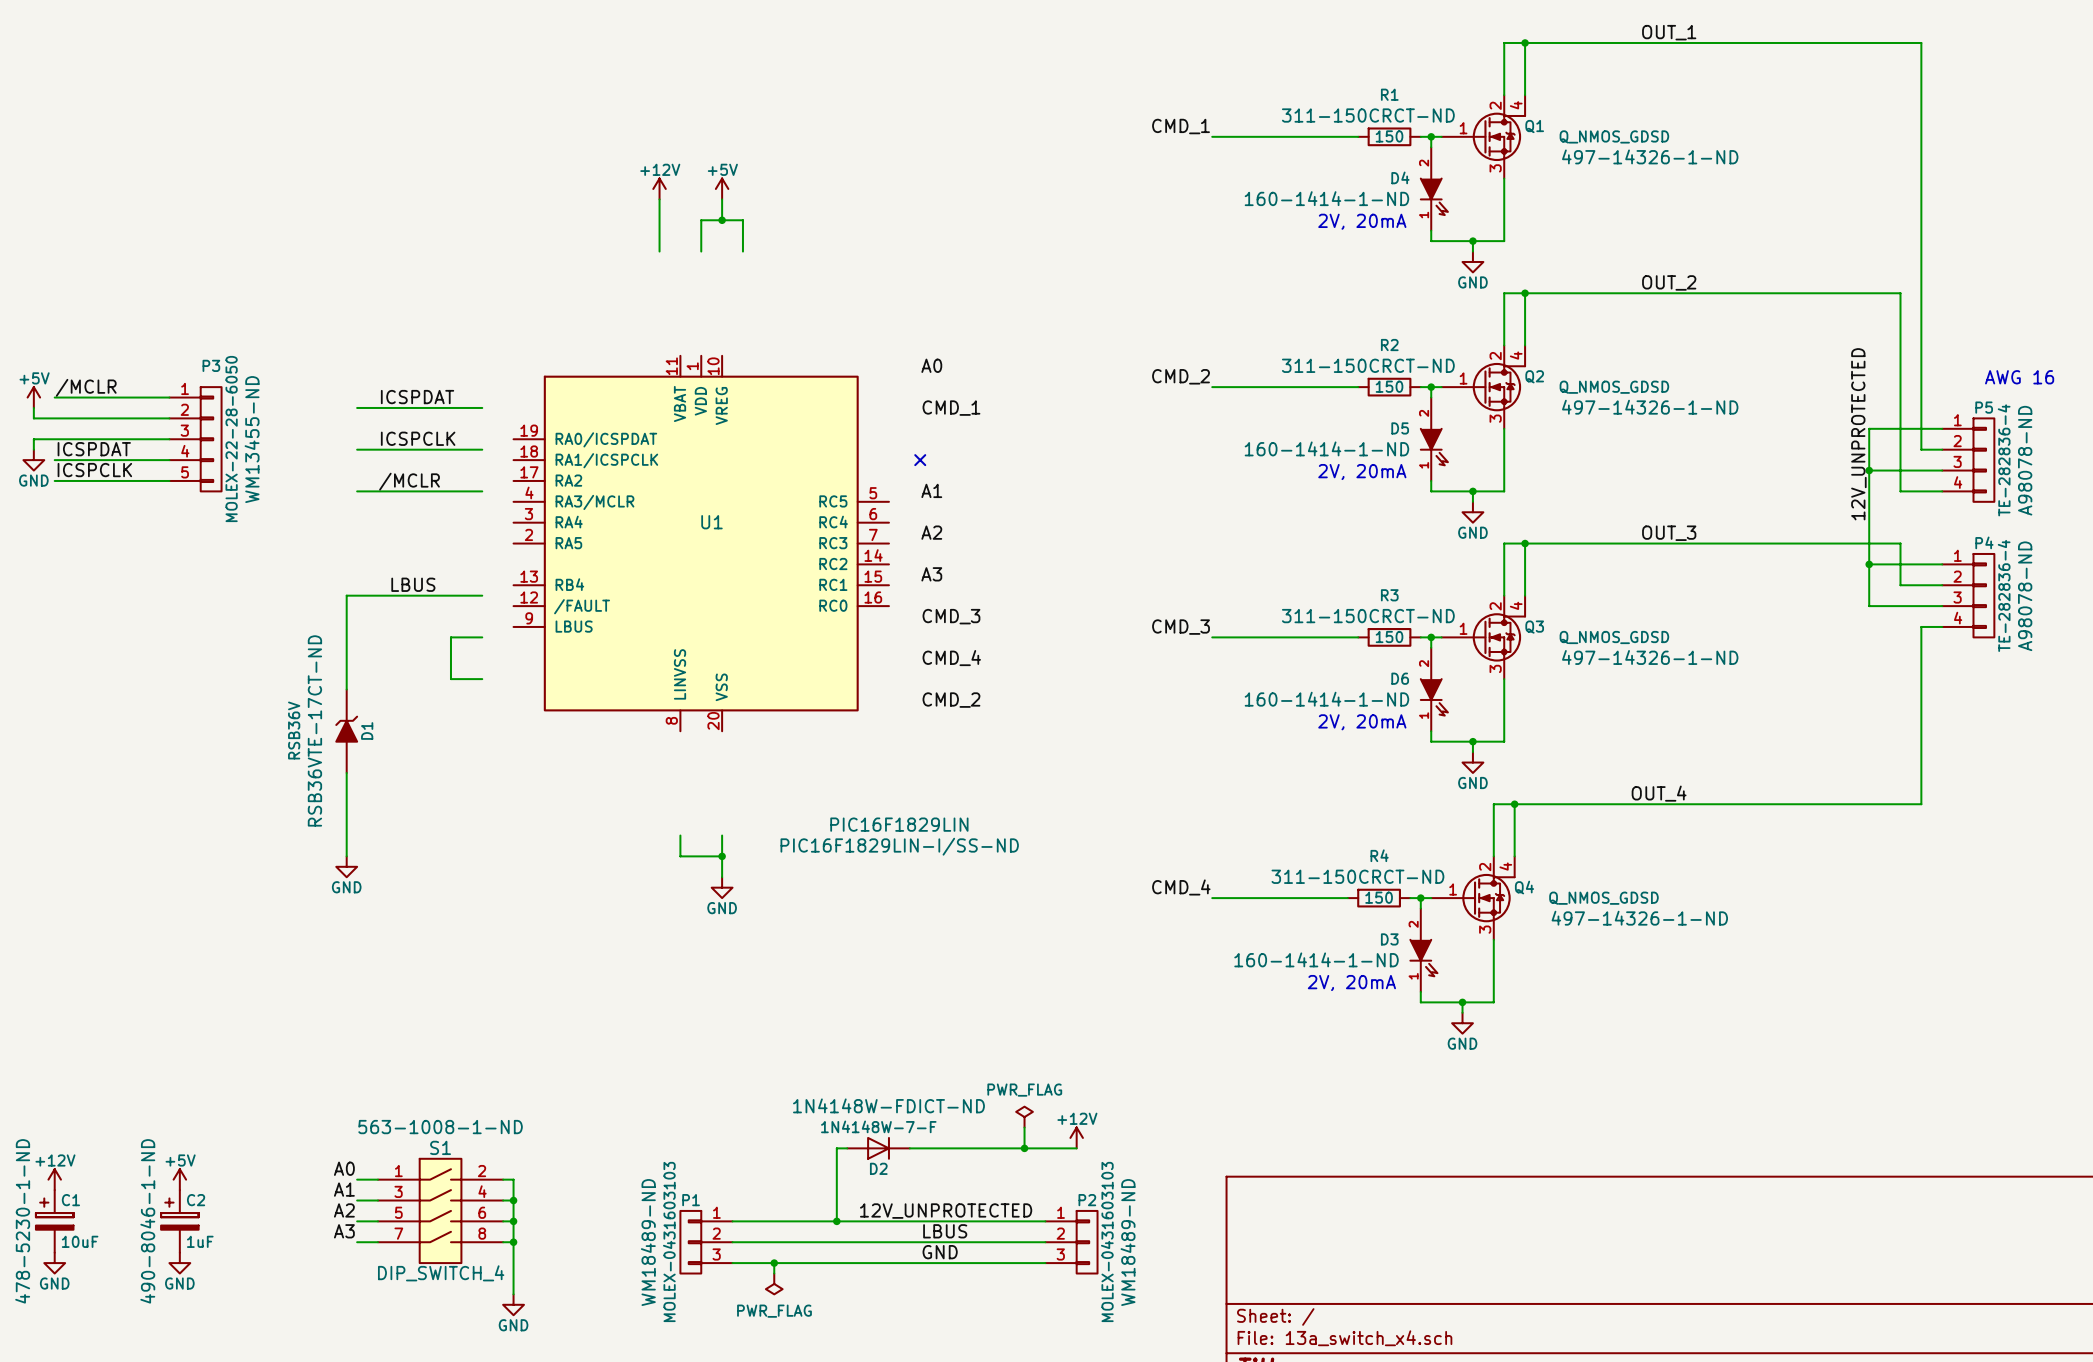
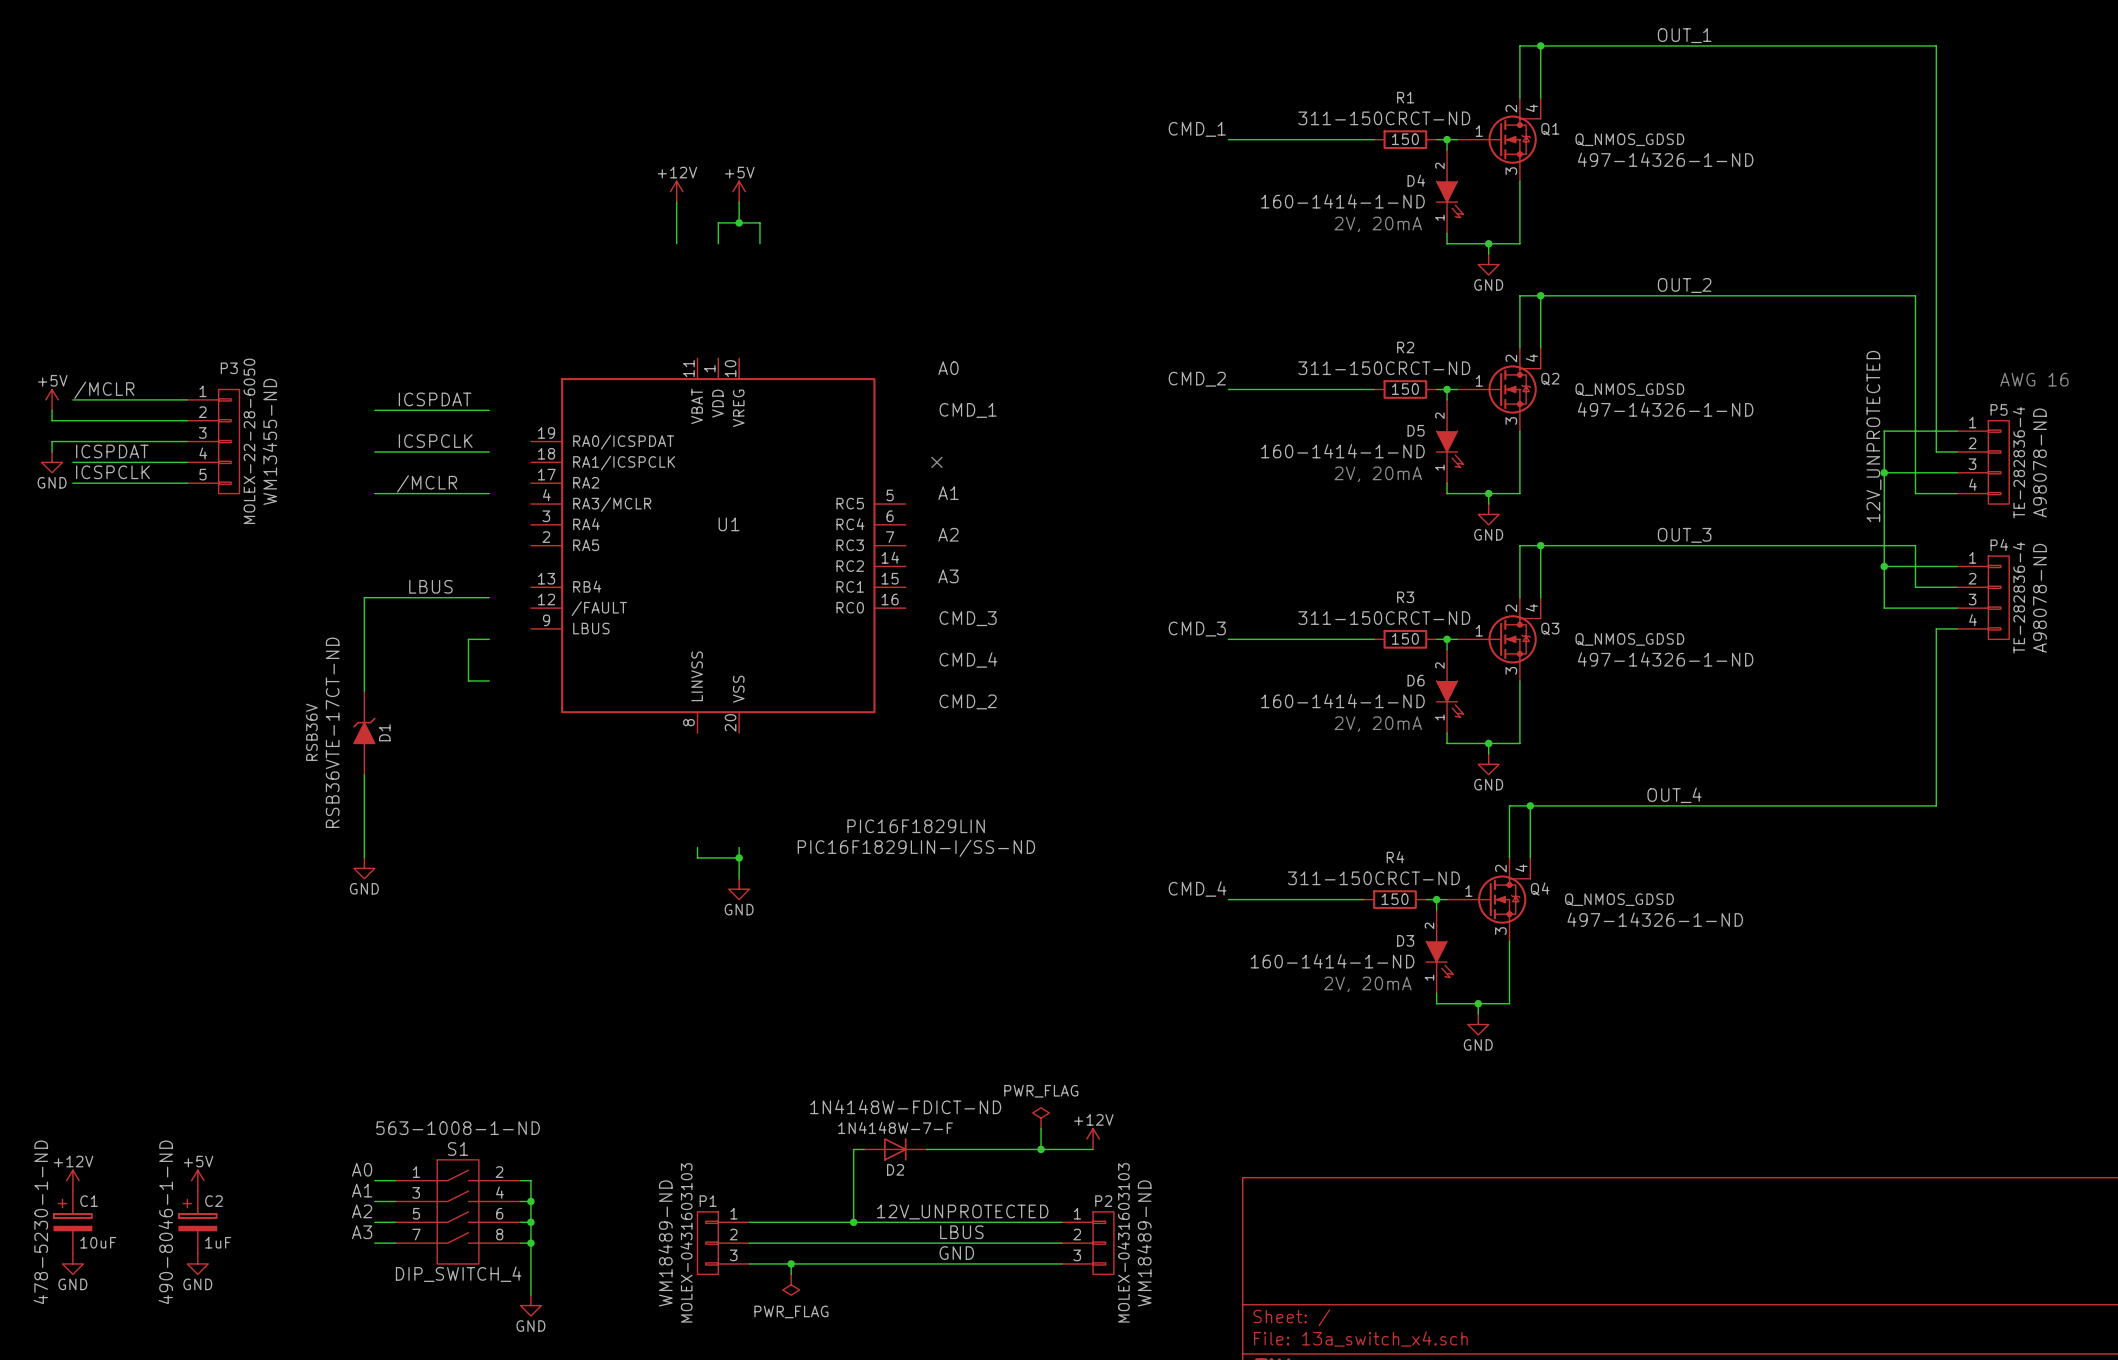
wire: (659, 241) (659, 251) -> none
wire: (701, 241) (701, 251) -> none
wire: (742, 241) (742, 251) -> none
wire: (471, 407) (482, 407) -> none
wire: (471, 449) (482, 449) -> none
wire: (471, 491) (482, 491) -> none
wire: (471, 595) (482, 595) -> none
wire: (471, 637) (482, 637) -> none
wire: (471, 679) (482, 679) -> none
wire: (680, 835) (680, 845) -> none
wire: (722, 835) (722, 845) -> none

